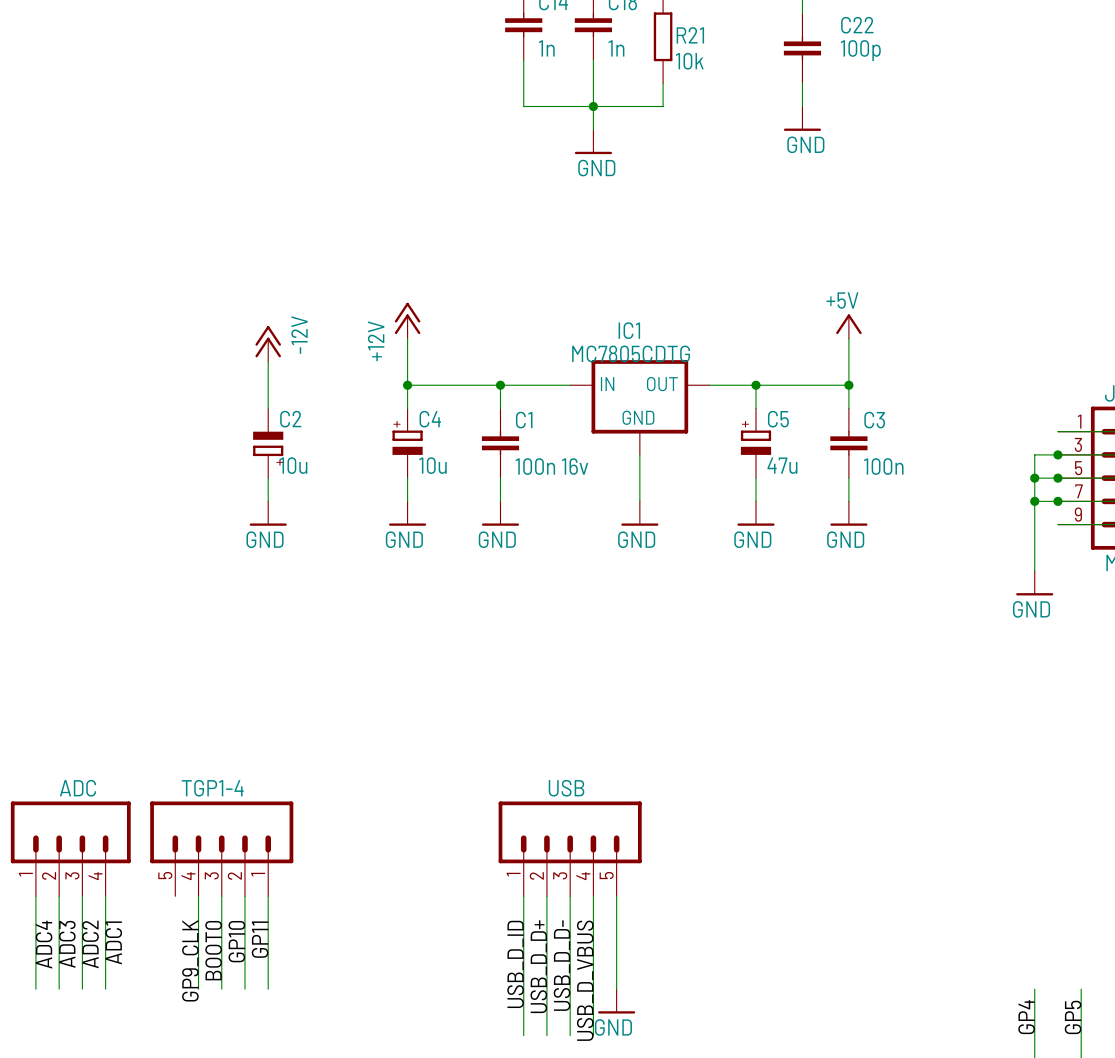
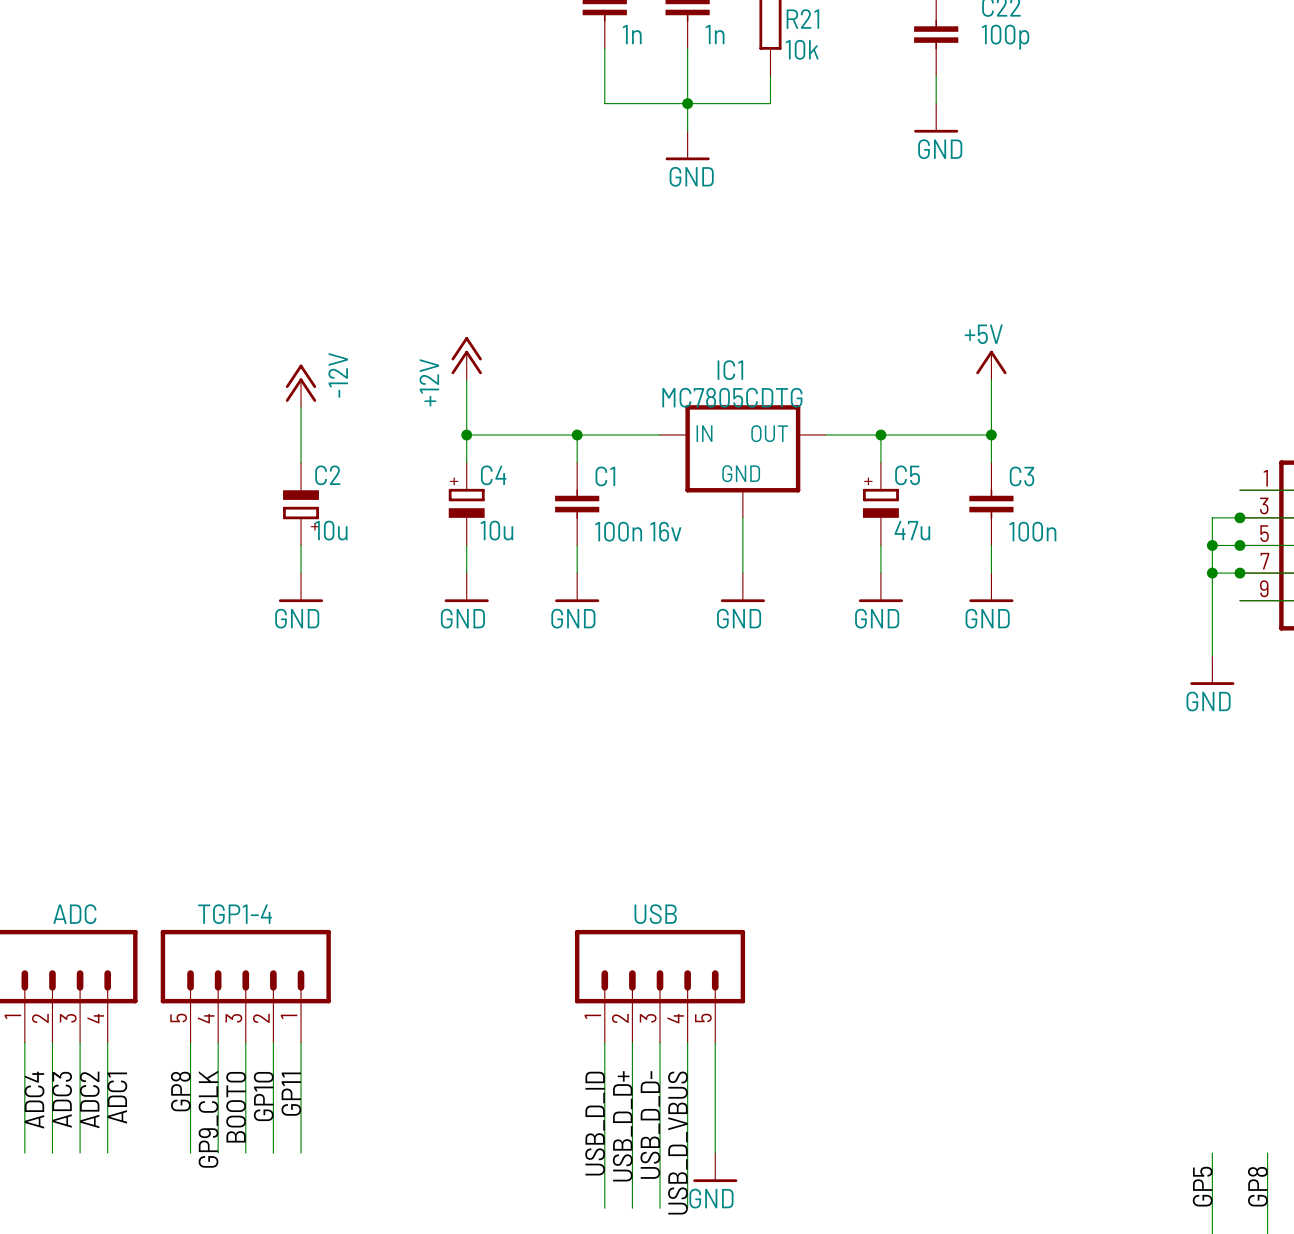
wire: none -> (190, 1042) (190, 1153)
label: none -> GP8 (180, 1091)
label: GP4 (1026, 1017) -> GP5 (1202, 1186)
label: GP5 (1073, 1017) -> GP8 (1257, 1186)

